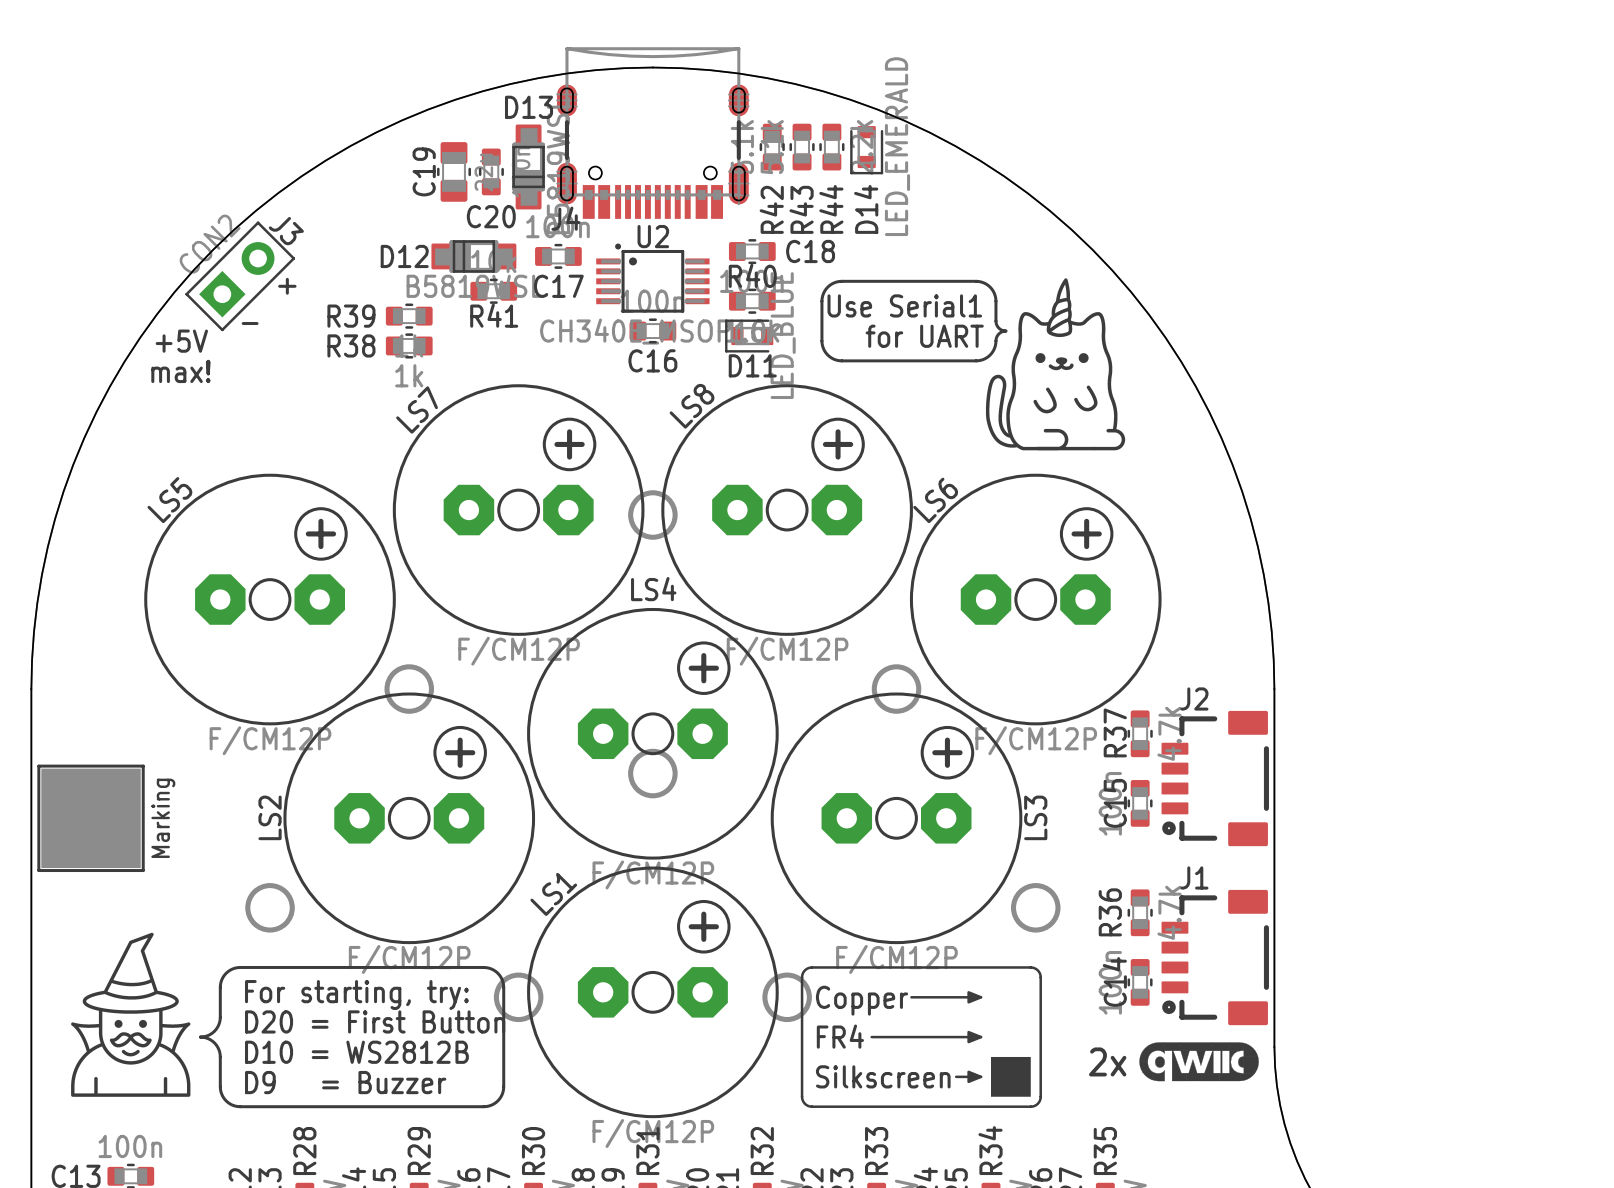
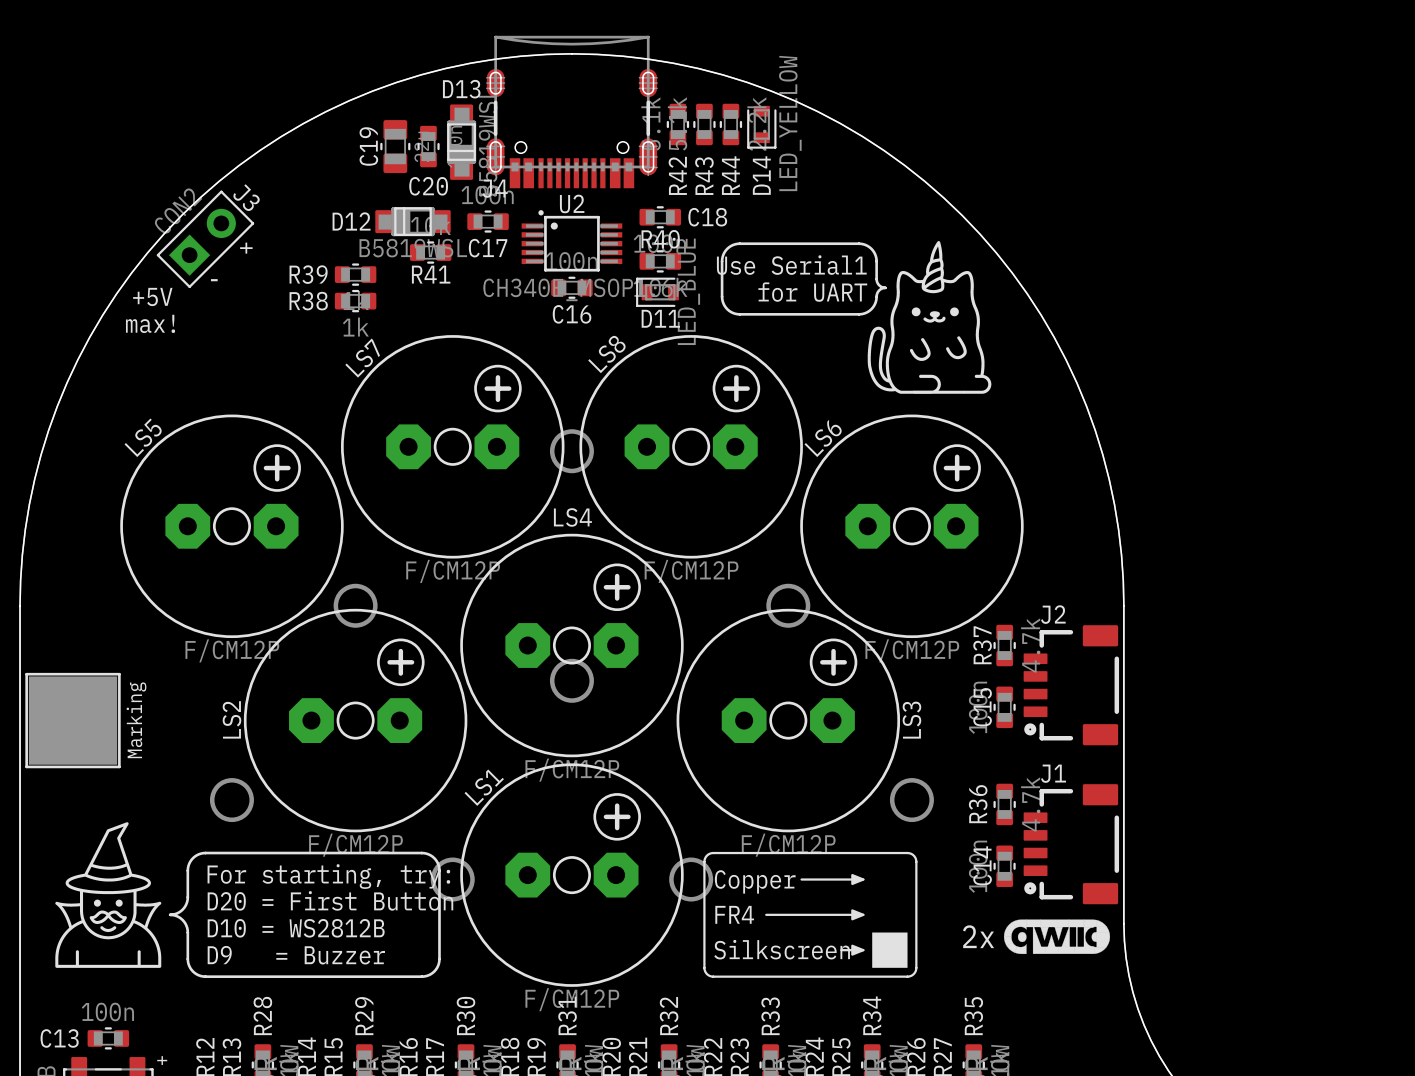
D14 value: LED_EMERALD (897, 146) -> LED_YELLOW (790, 123)

